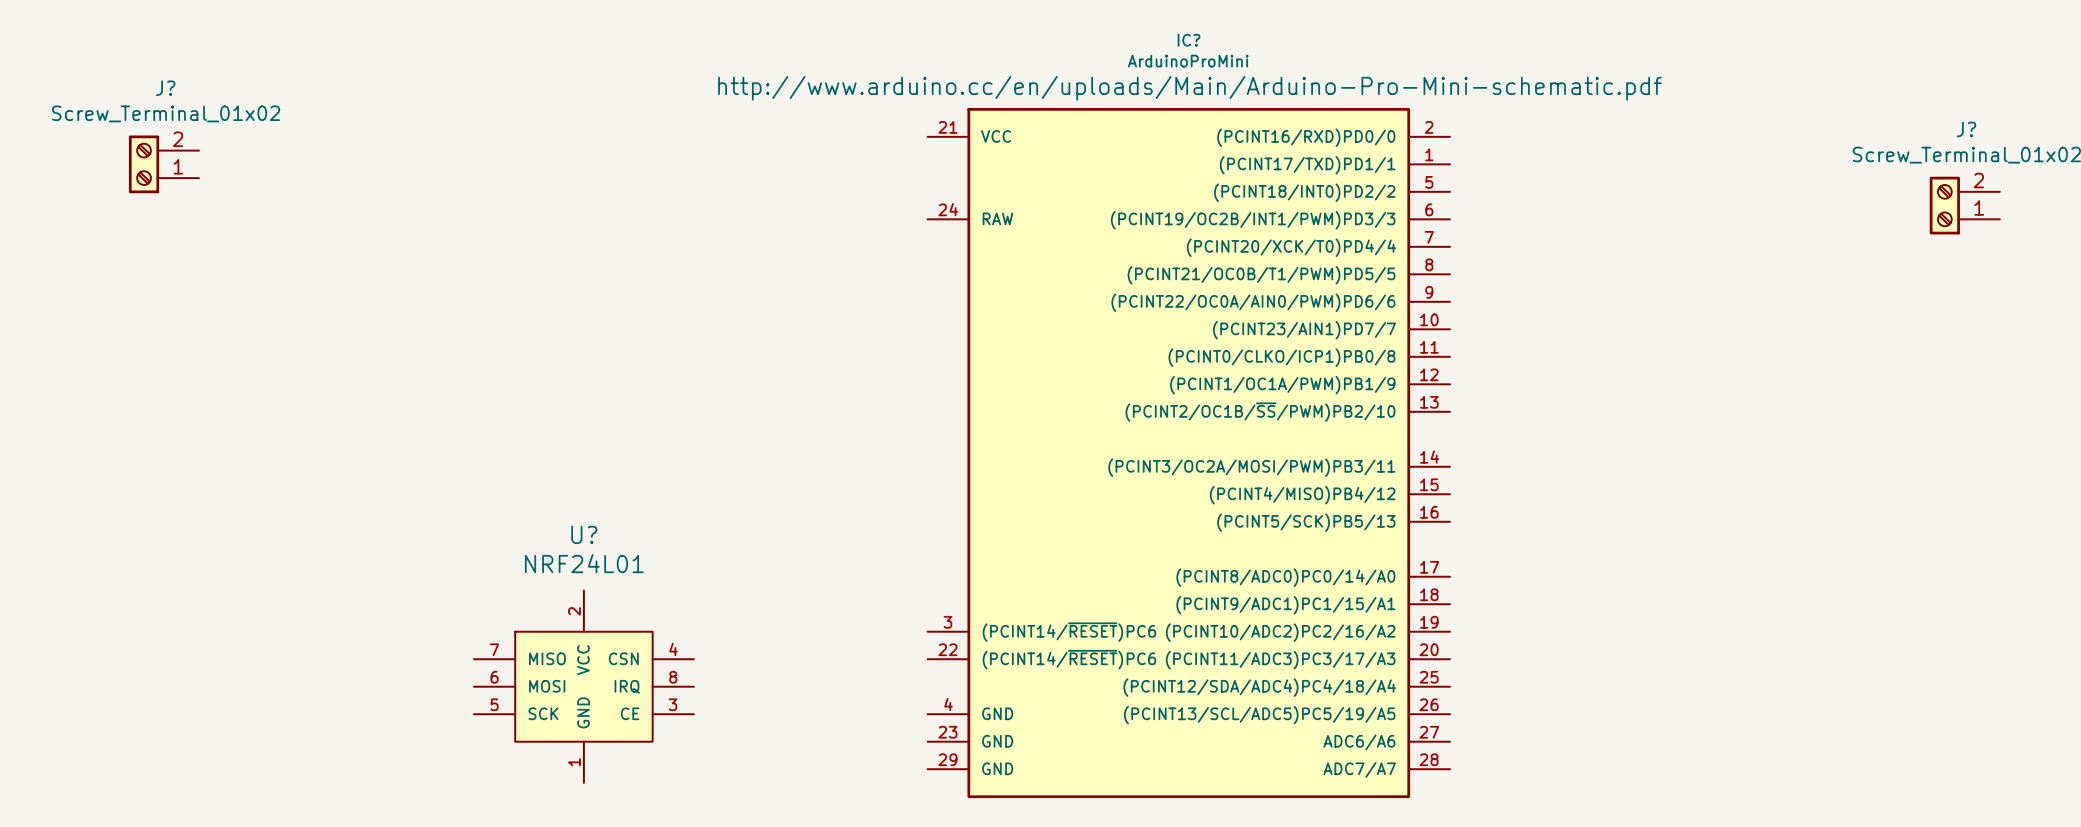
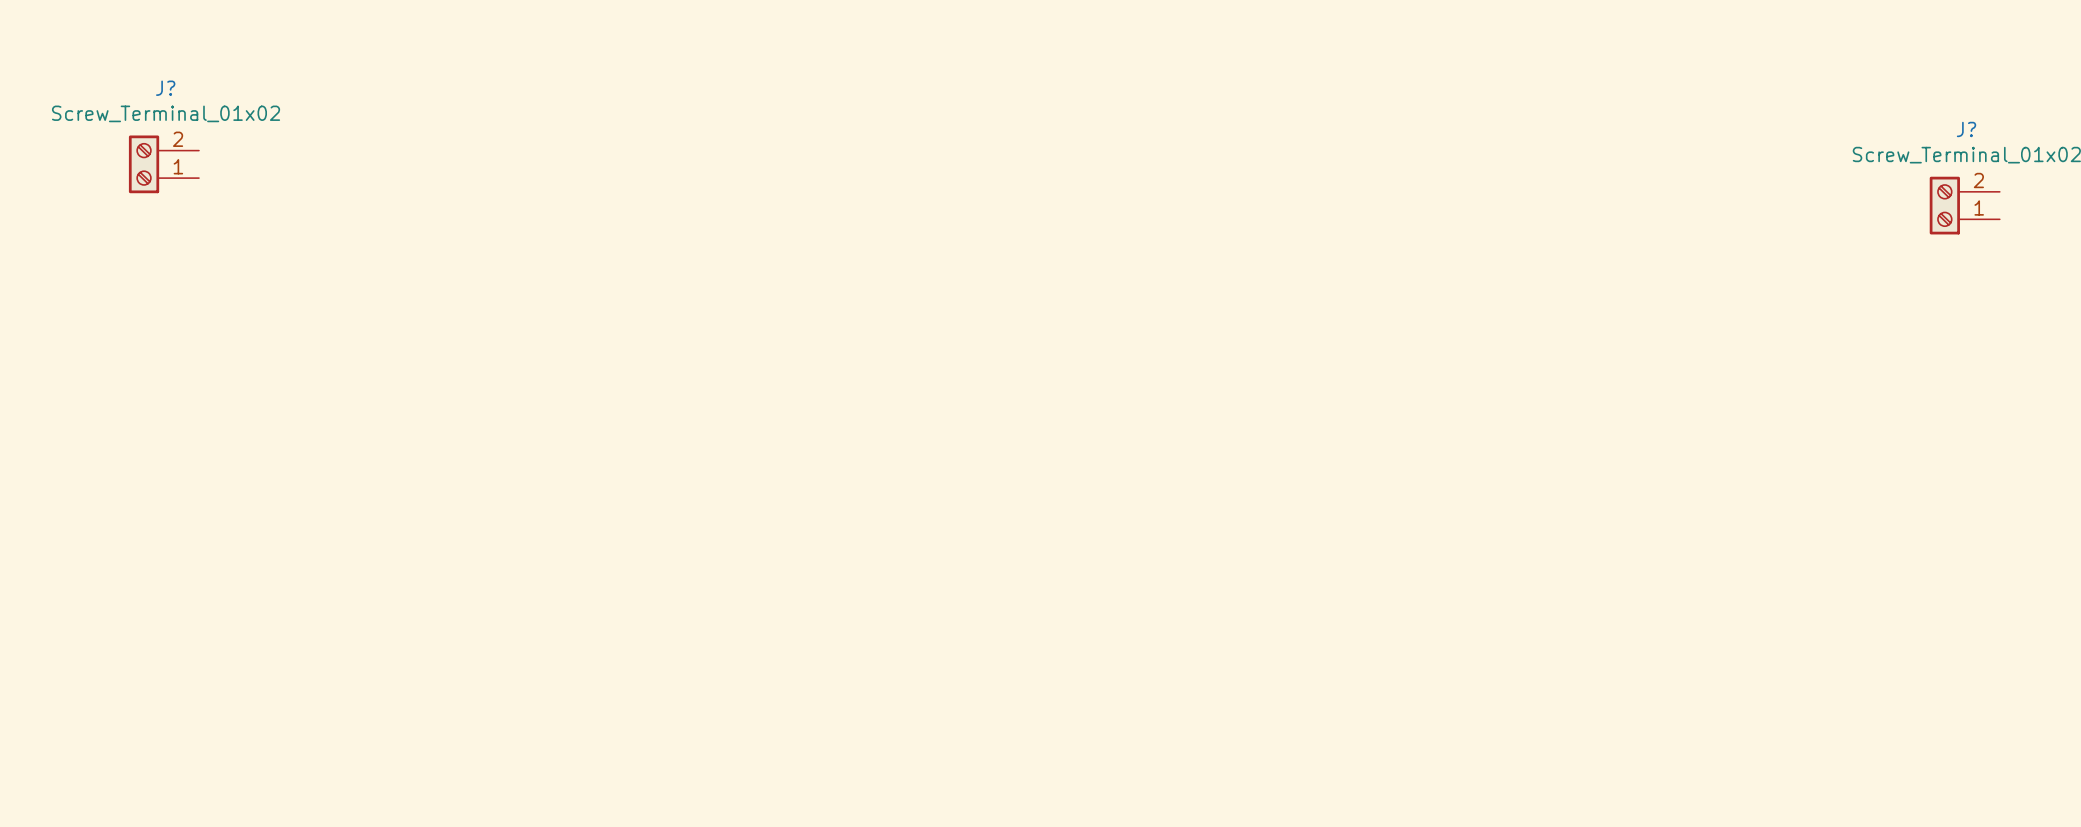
IC?: ArduinoProMini (1188, 453) -> none
U?: NRF24L01 (583, 686) -> none

